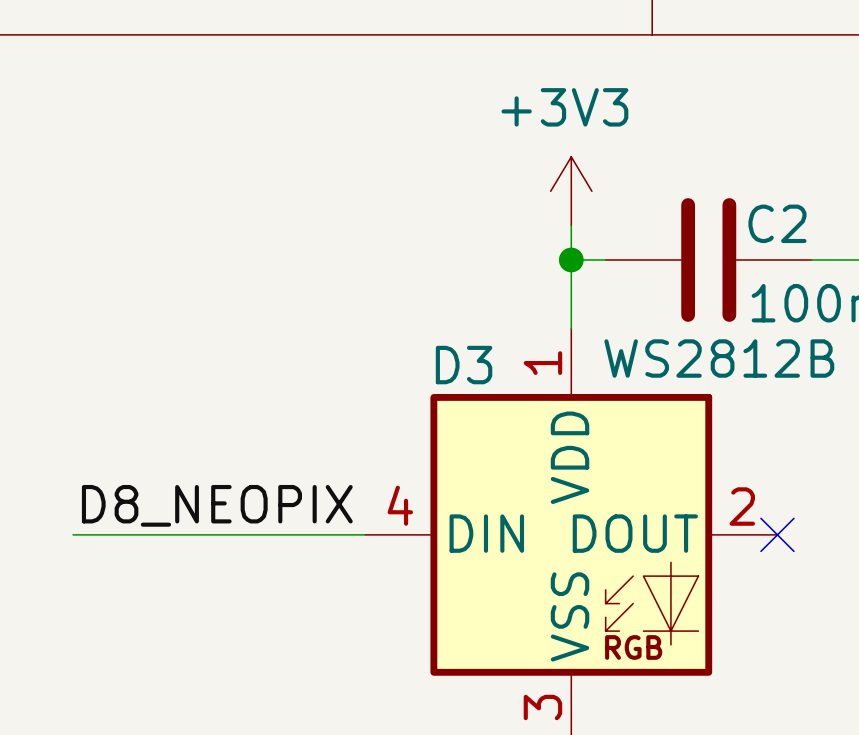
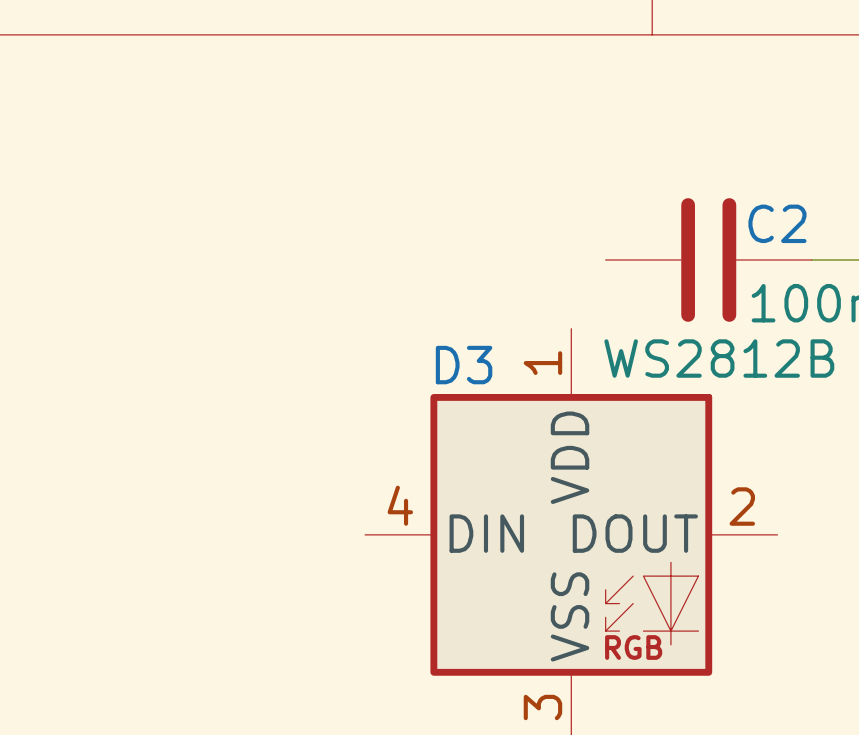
power symbol: +3V3 (571, 191) -> none
wire: (571, 225) (571, 328) -> none
wire: (571, 259) (605, 259) -> none
junction: (571, 259) -> none
label: D8_NEOPIX (217, 505) -> none
wire: (73, 534) (365, 534) -> none
no-connect mark: (777, 534) -> none

